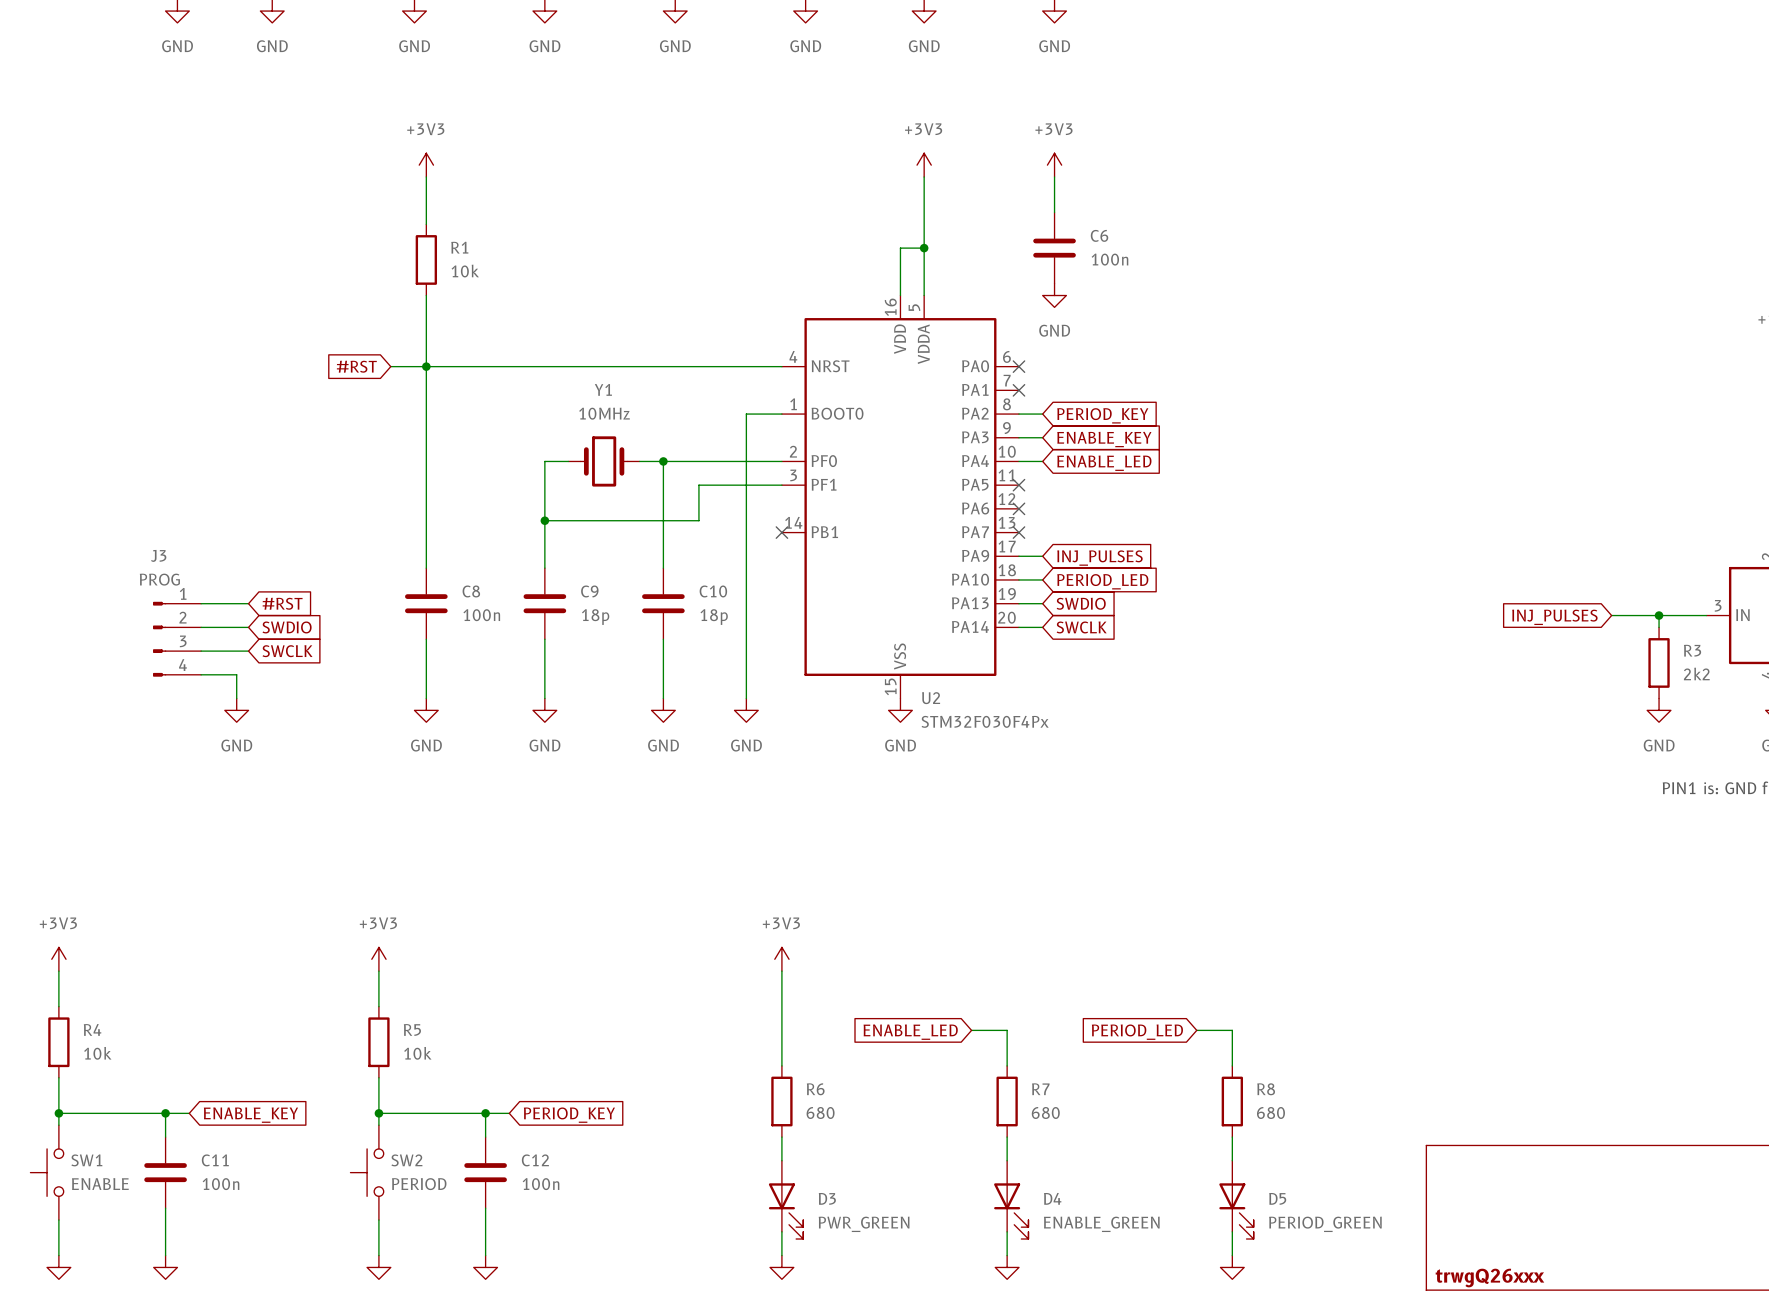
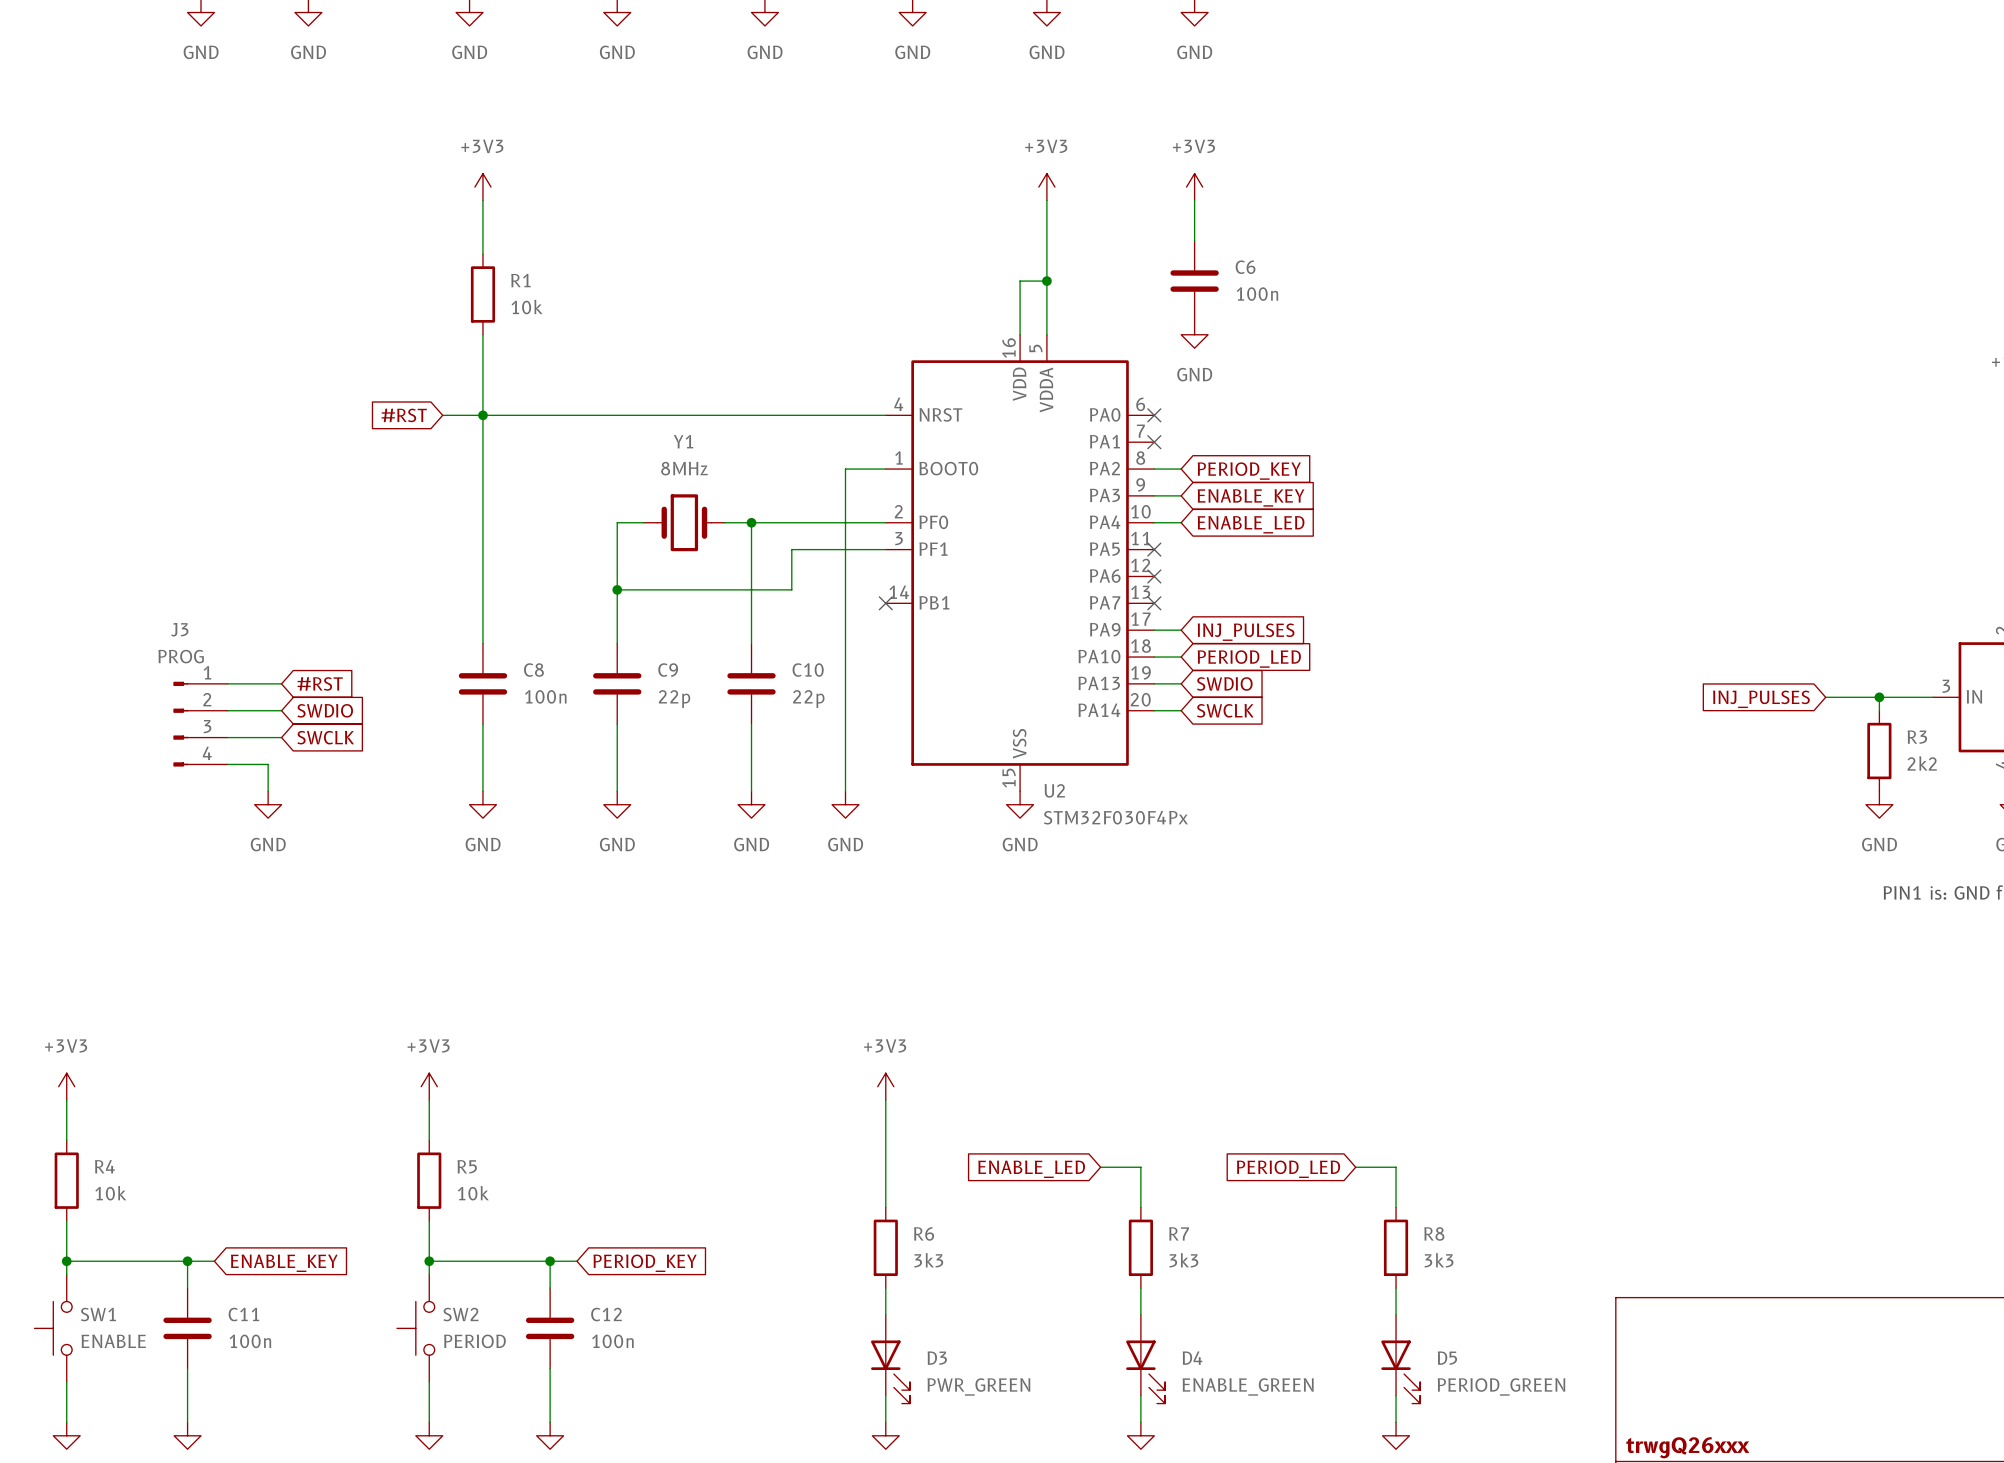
Y1 value: 10MHz (604, 413) -> 8MHz (684, 468)
C9 value: 18p (595, 617) -> 22p (674, 699)
C10 value: 18p (714, 617) -> 22p (808, 699)
R6 value: 680 (820, 1112) -> 3k3 (928, 1260)
R7 value: 680 (1045, 1112) -> 3k3 (1183, 1260)
R8 value: 680 (1270, 1112) -> 3k3 (1439, 1260)

